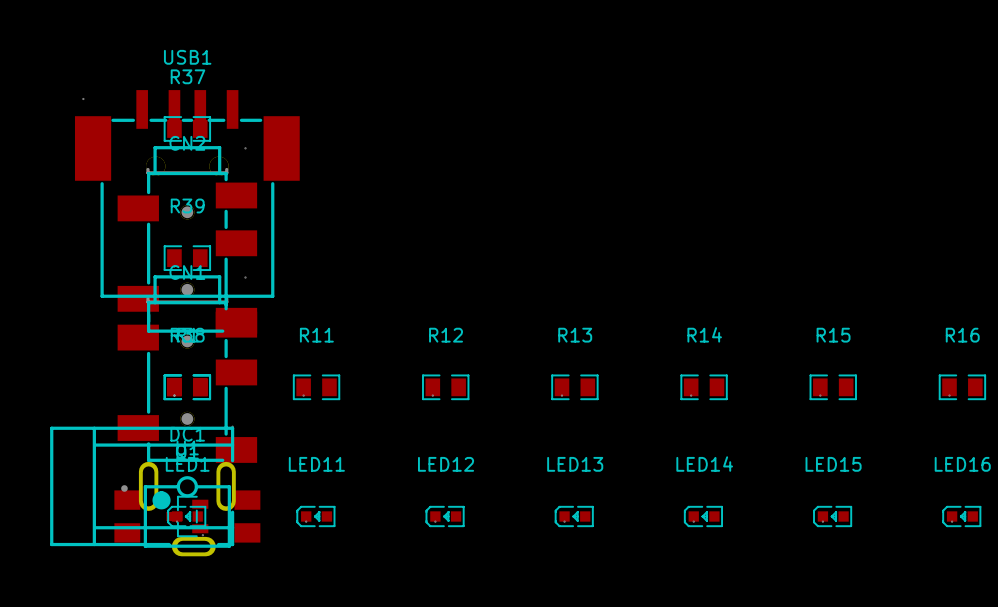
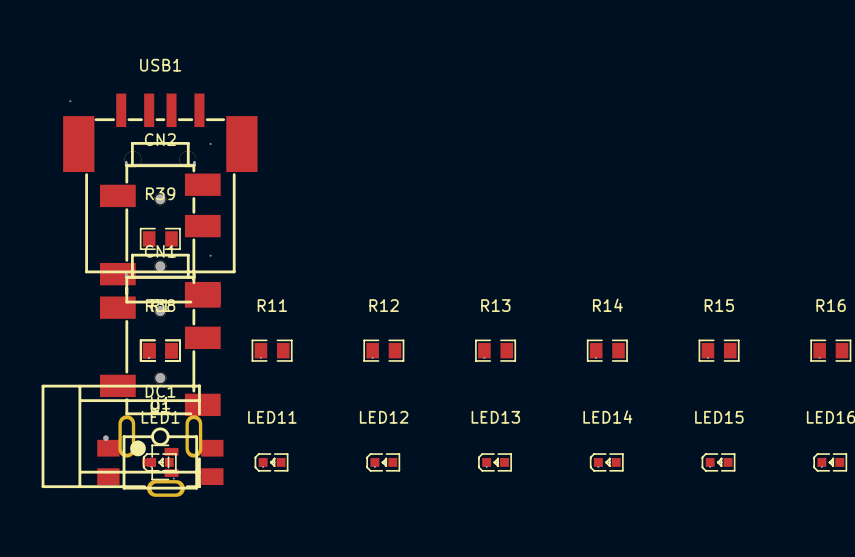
R37: (187, 128) -> none

